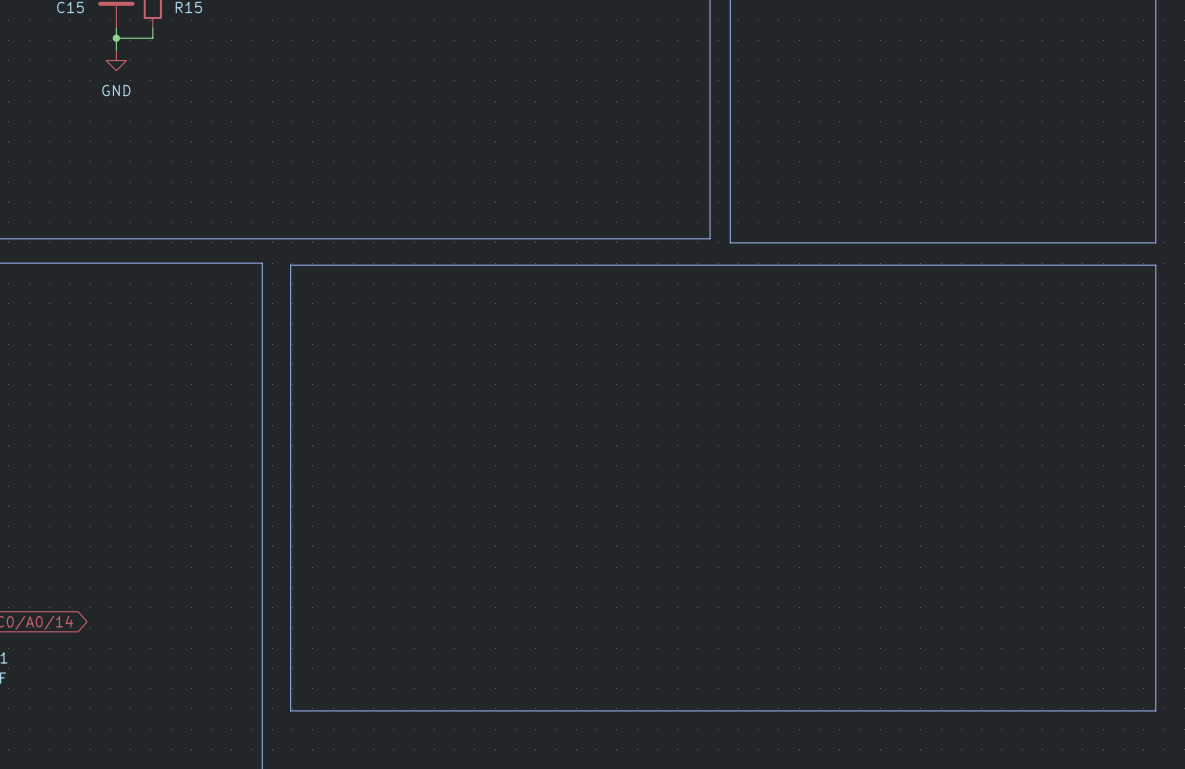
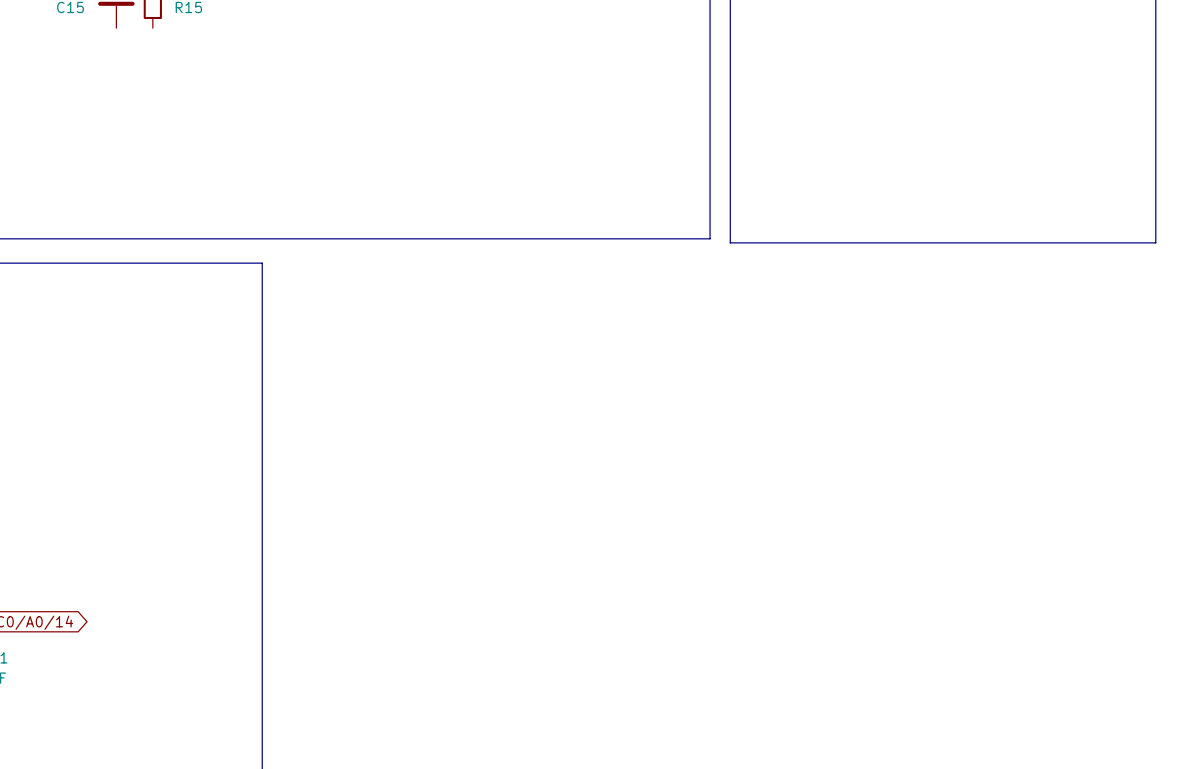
wire: (116, 28) (116, 50) -> none
wire: (152, 28) (152, 38) (116, 38) -> none
junction: (116, 38) -> none
power symbol: GND (116, 60) -> none
line: (290, 265) (1155, 265) (1155, 710) (290, 710) (290, 265) -> none

